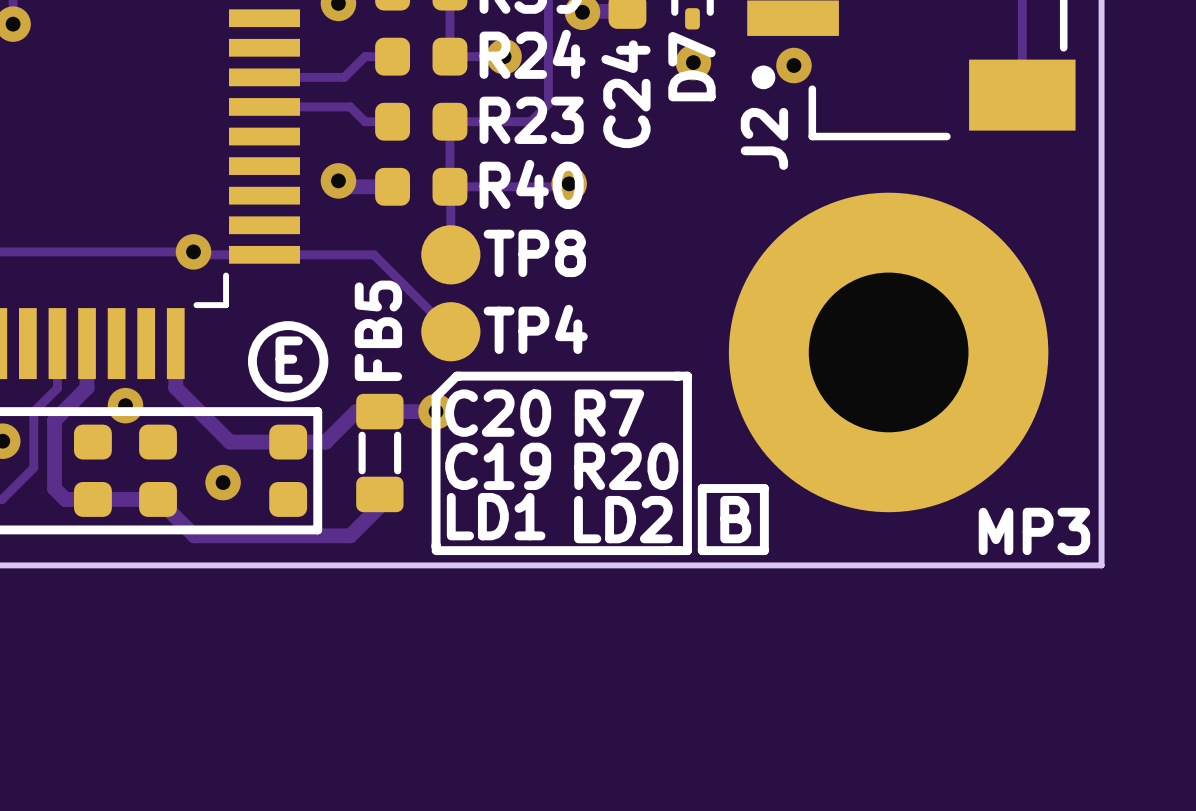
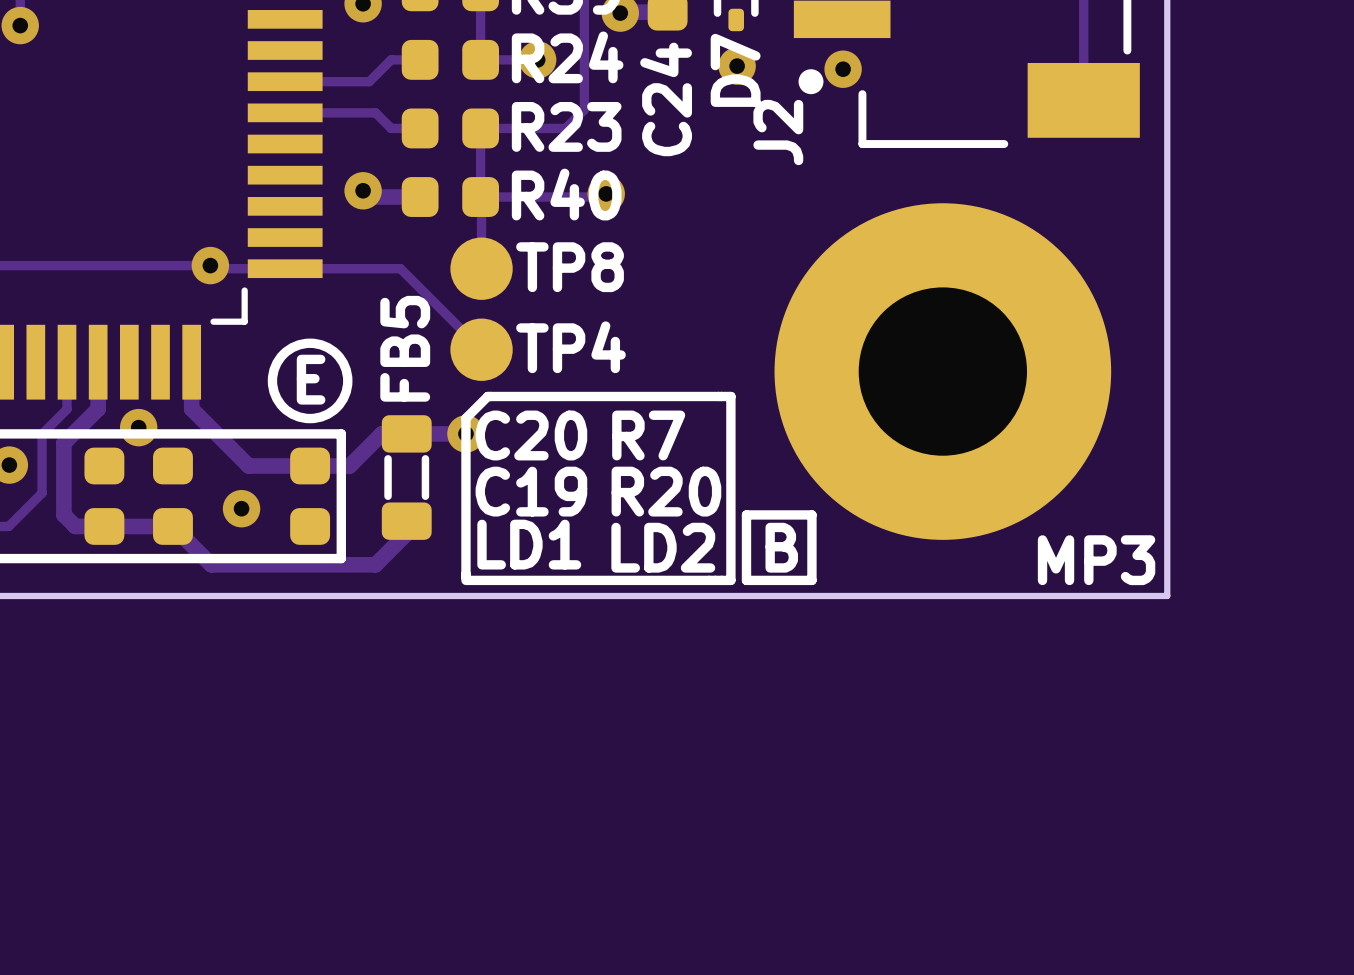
J2 name position: J2 (764, 138) -> J2 (778, 132)

